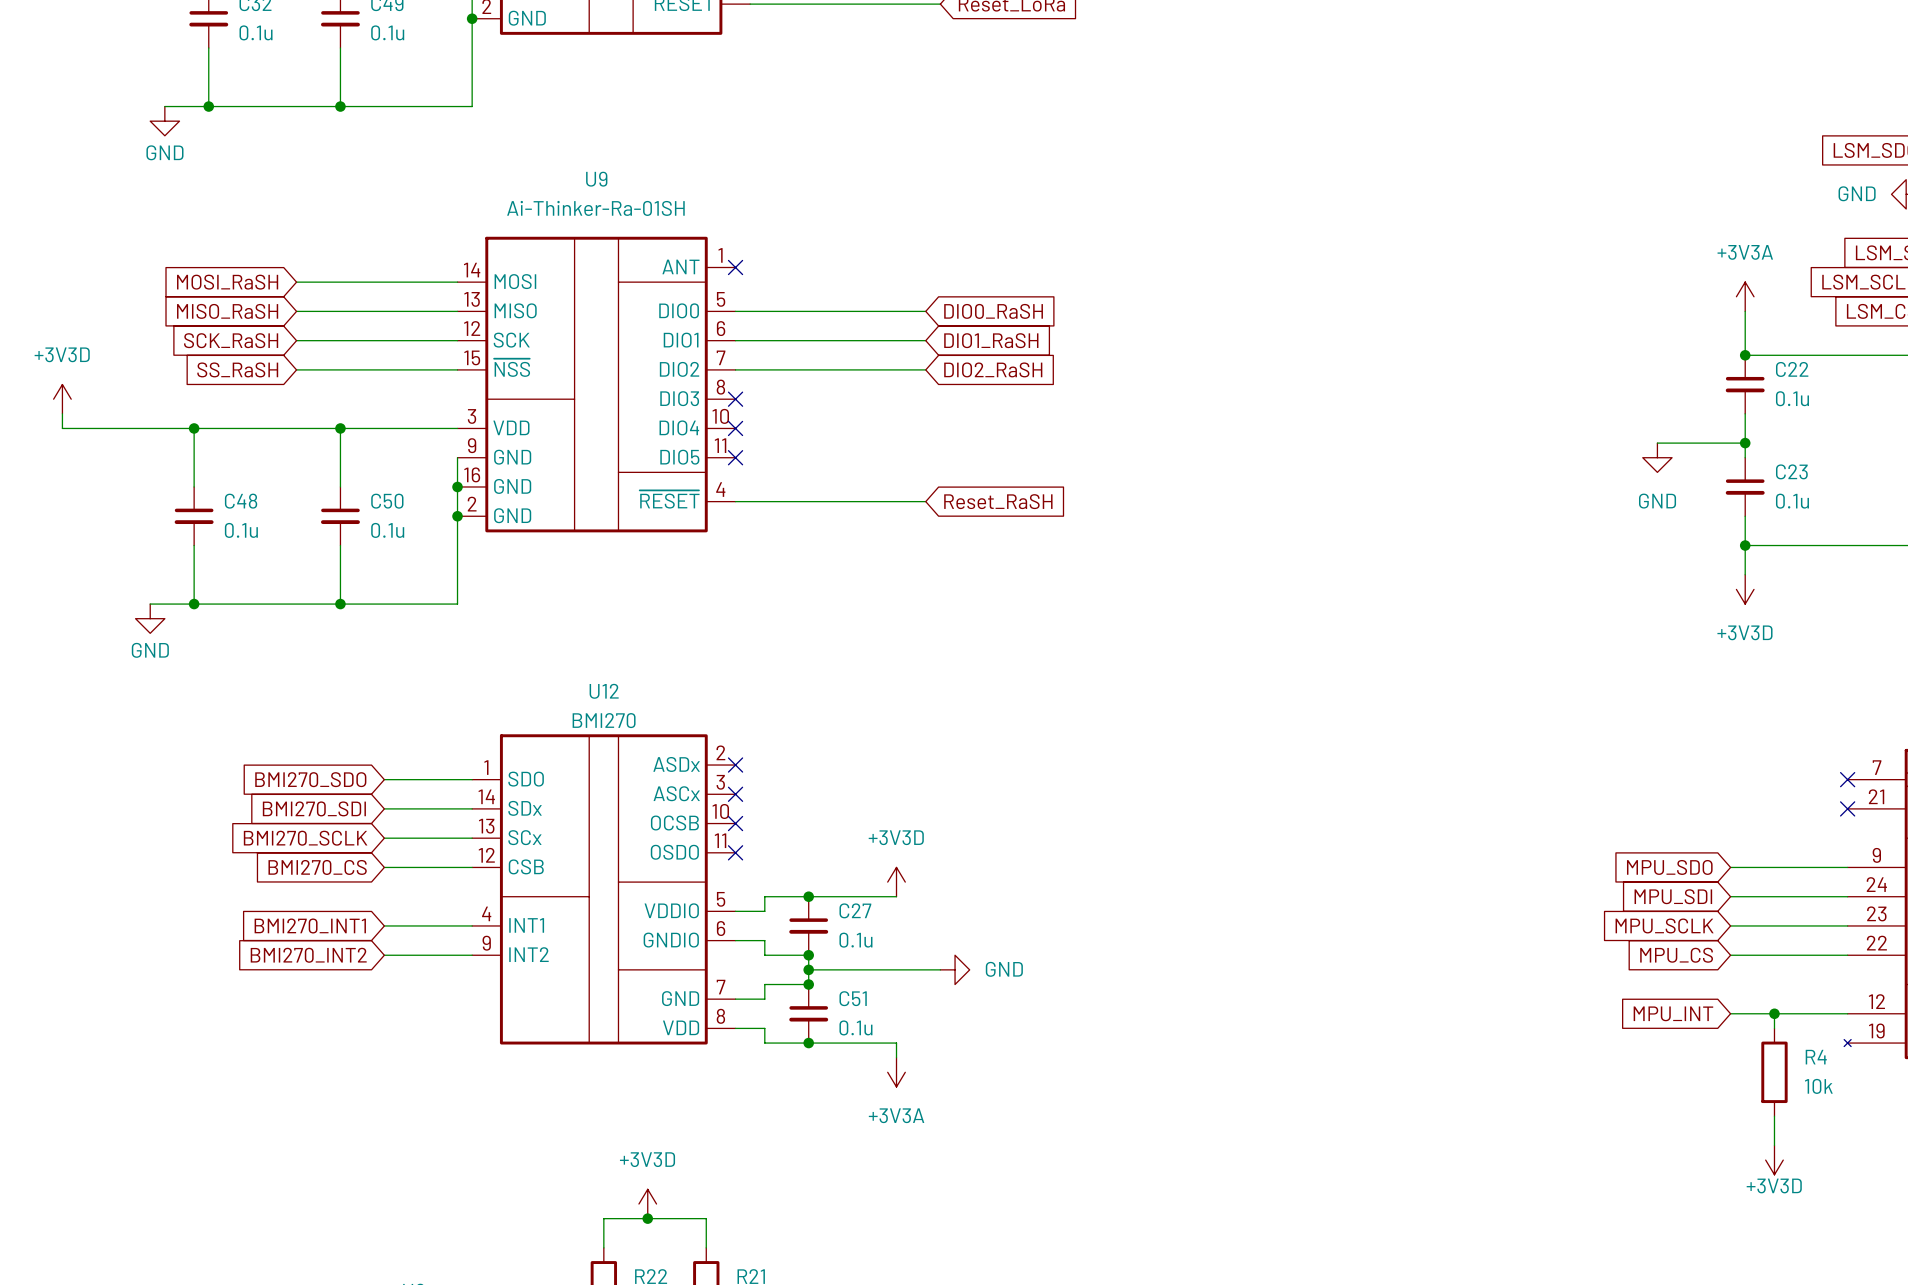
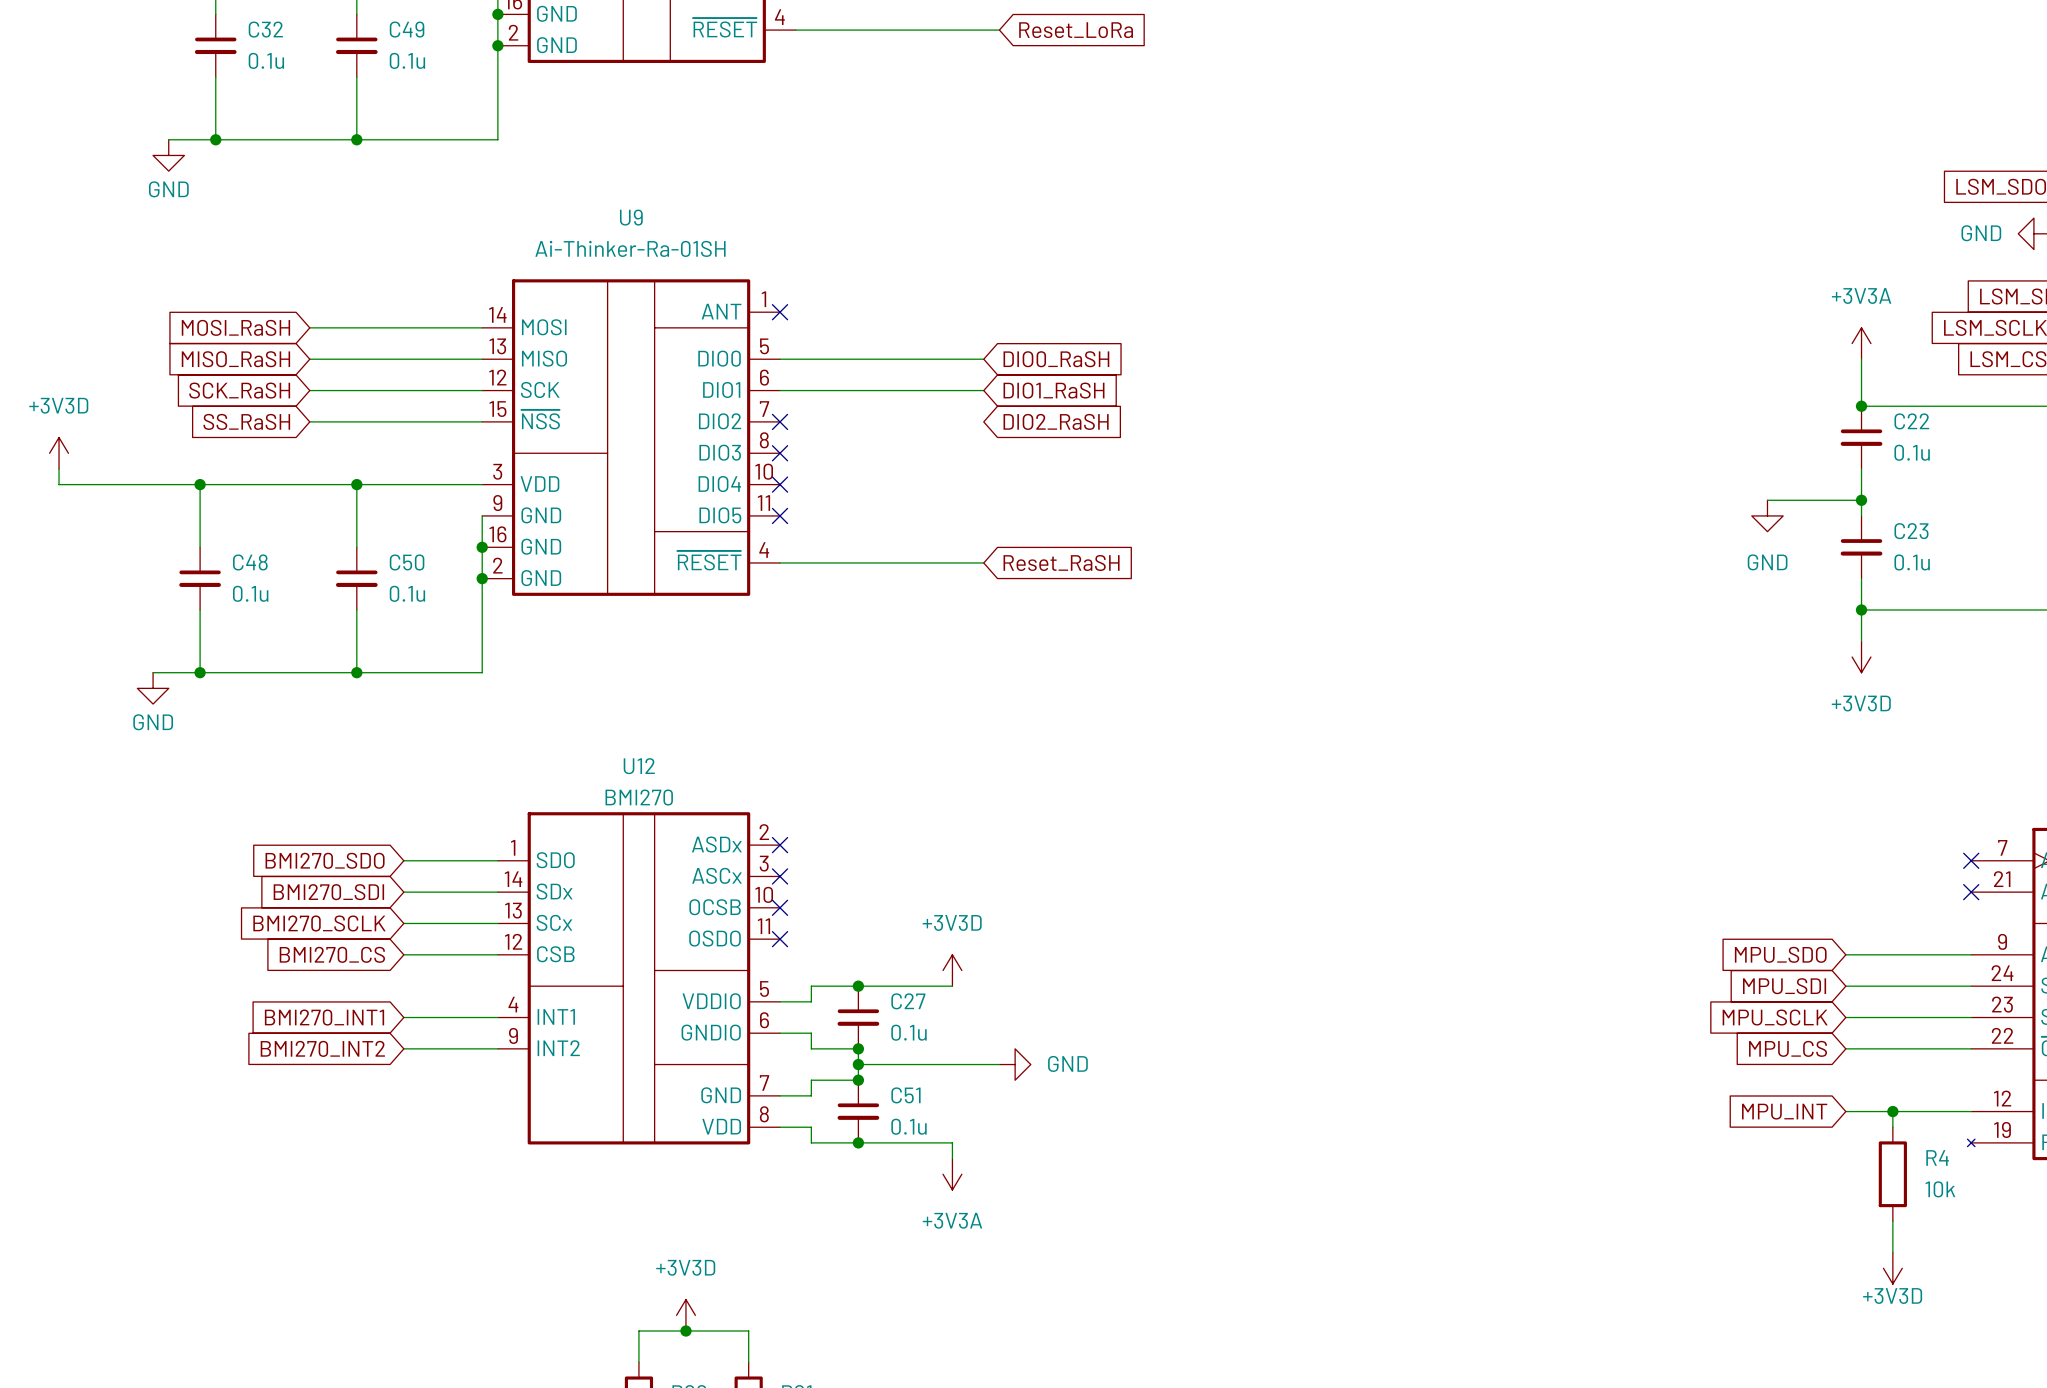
wire: (735, 369) (925, 369) -> none
no-connect mark: none -> (780, 421)

